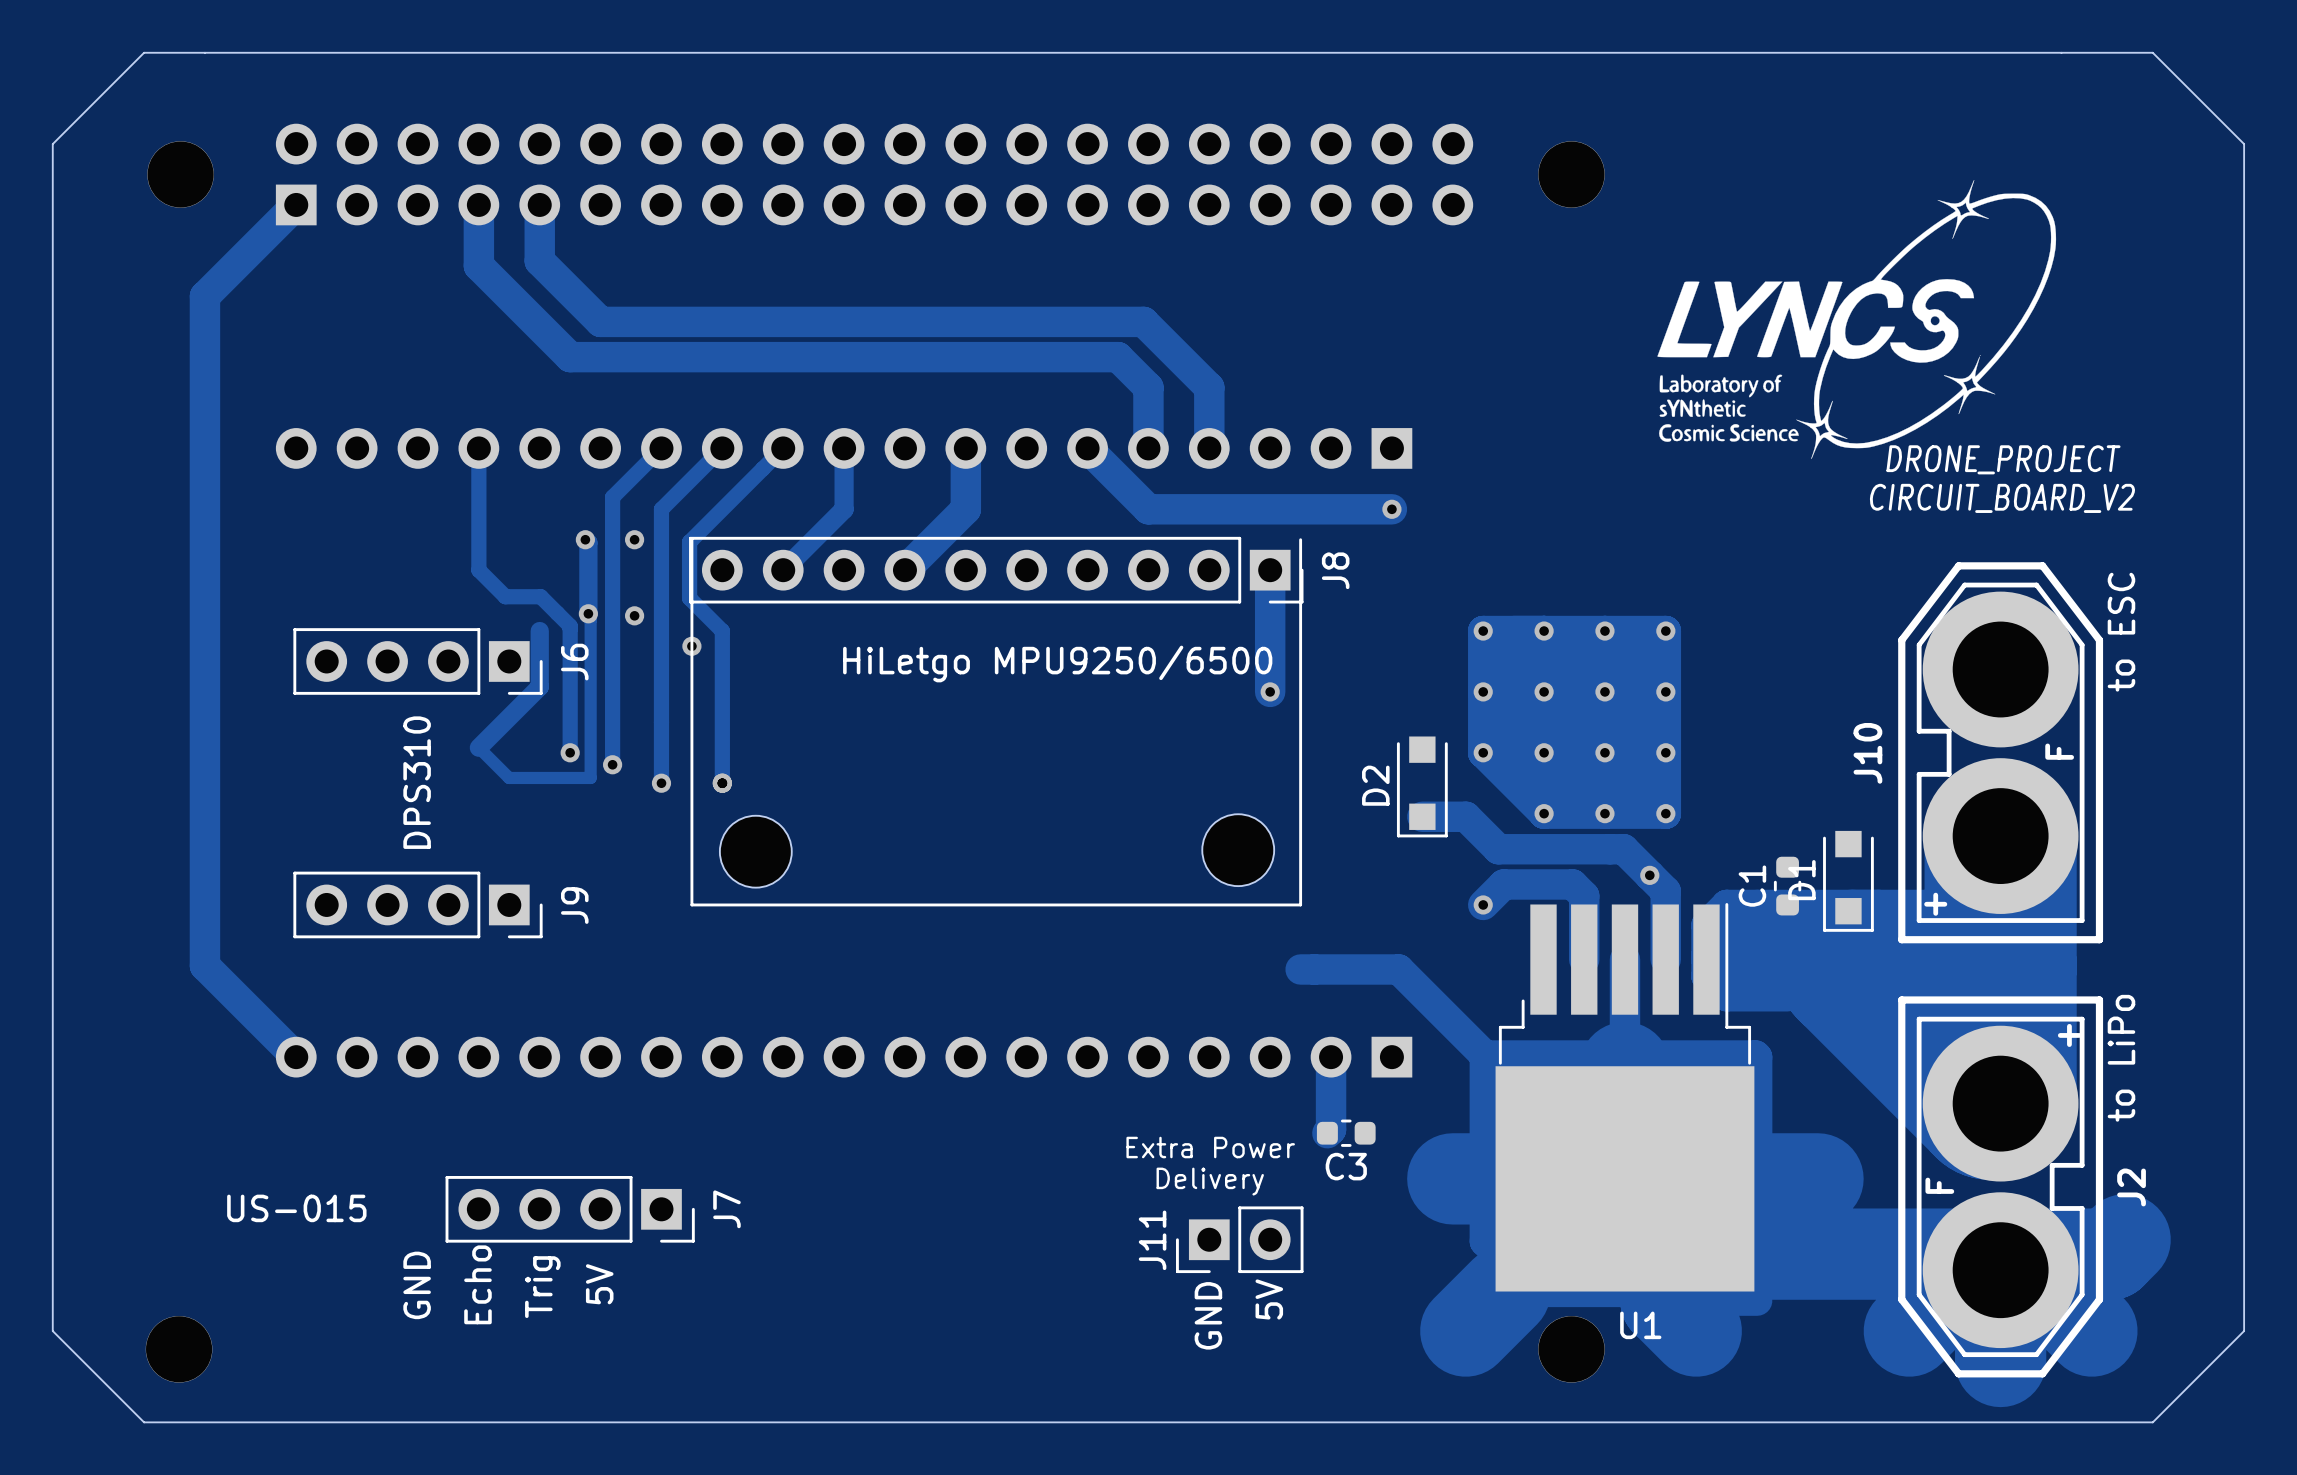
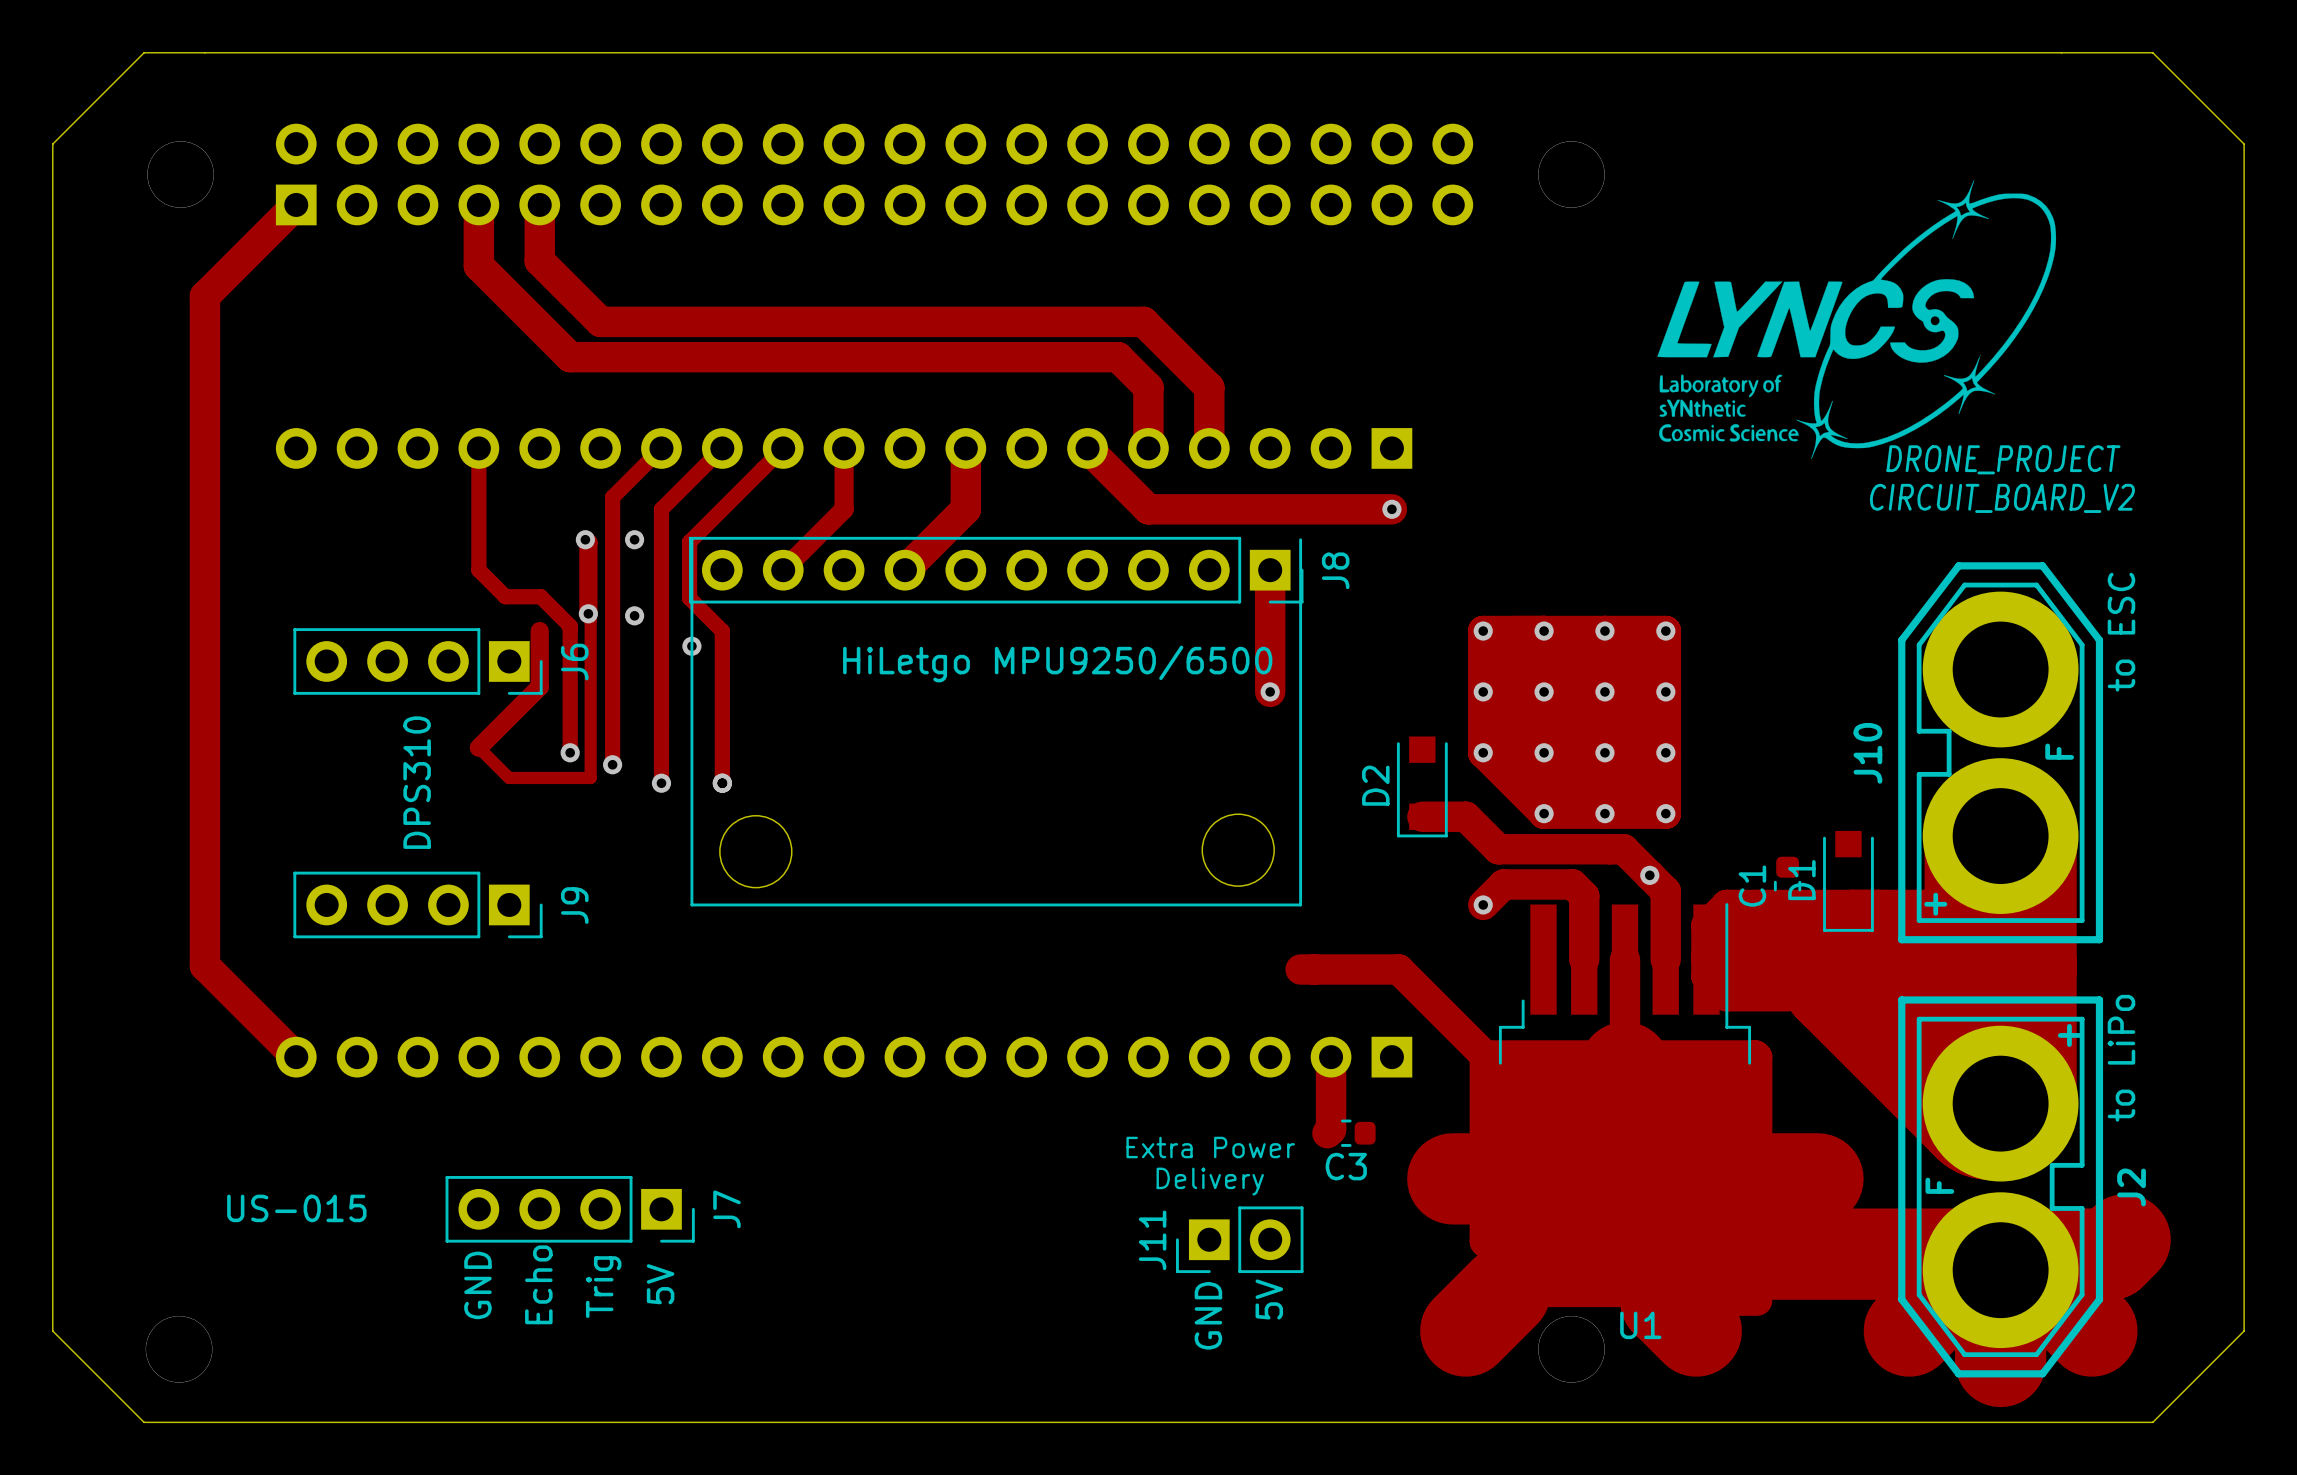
text: Echo (477, 1284) -> GND (477, 1285)
text: 5V (599, 1284) -> Trig (603, 1287)
text: none -> 5V (660, 1284)
text: GND (417, 1285) -> none
text: Trig (542, 1287) -> Echo (538, 1284)

